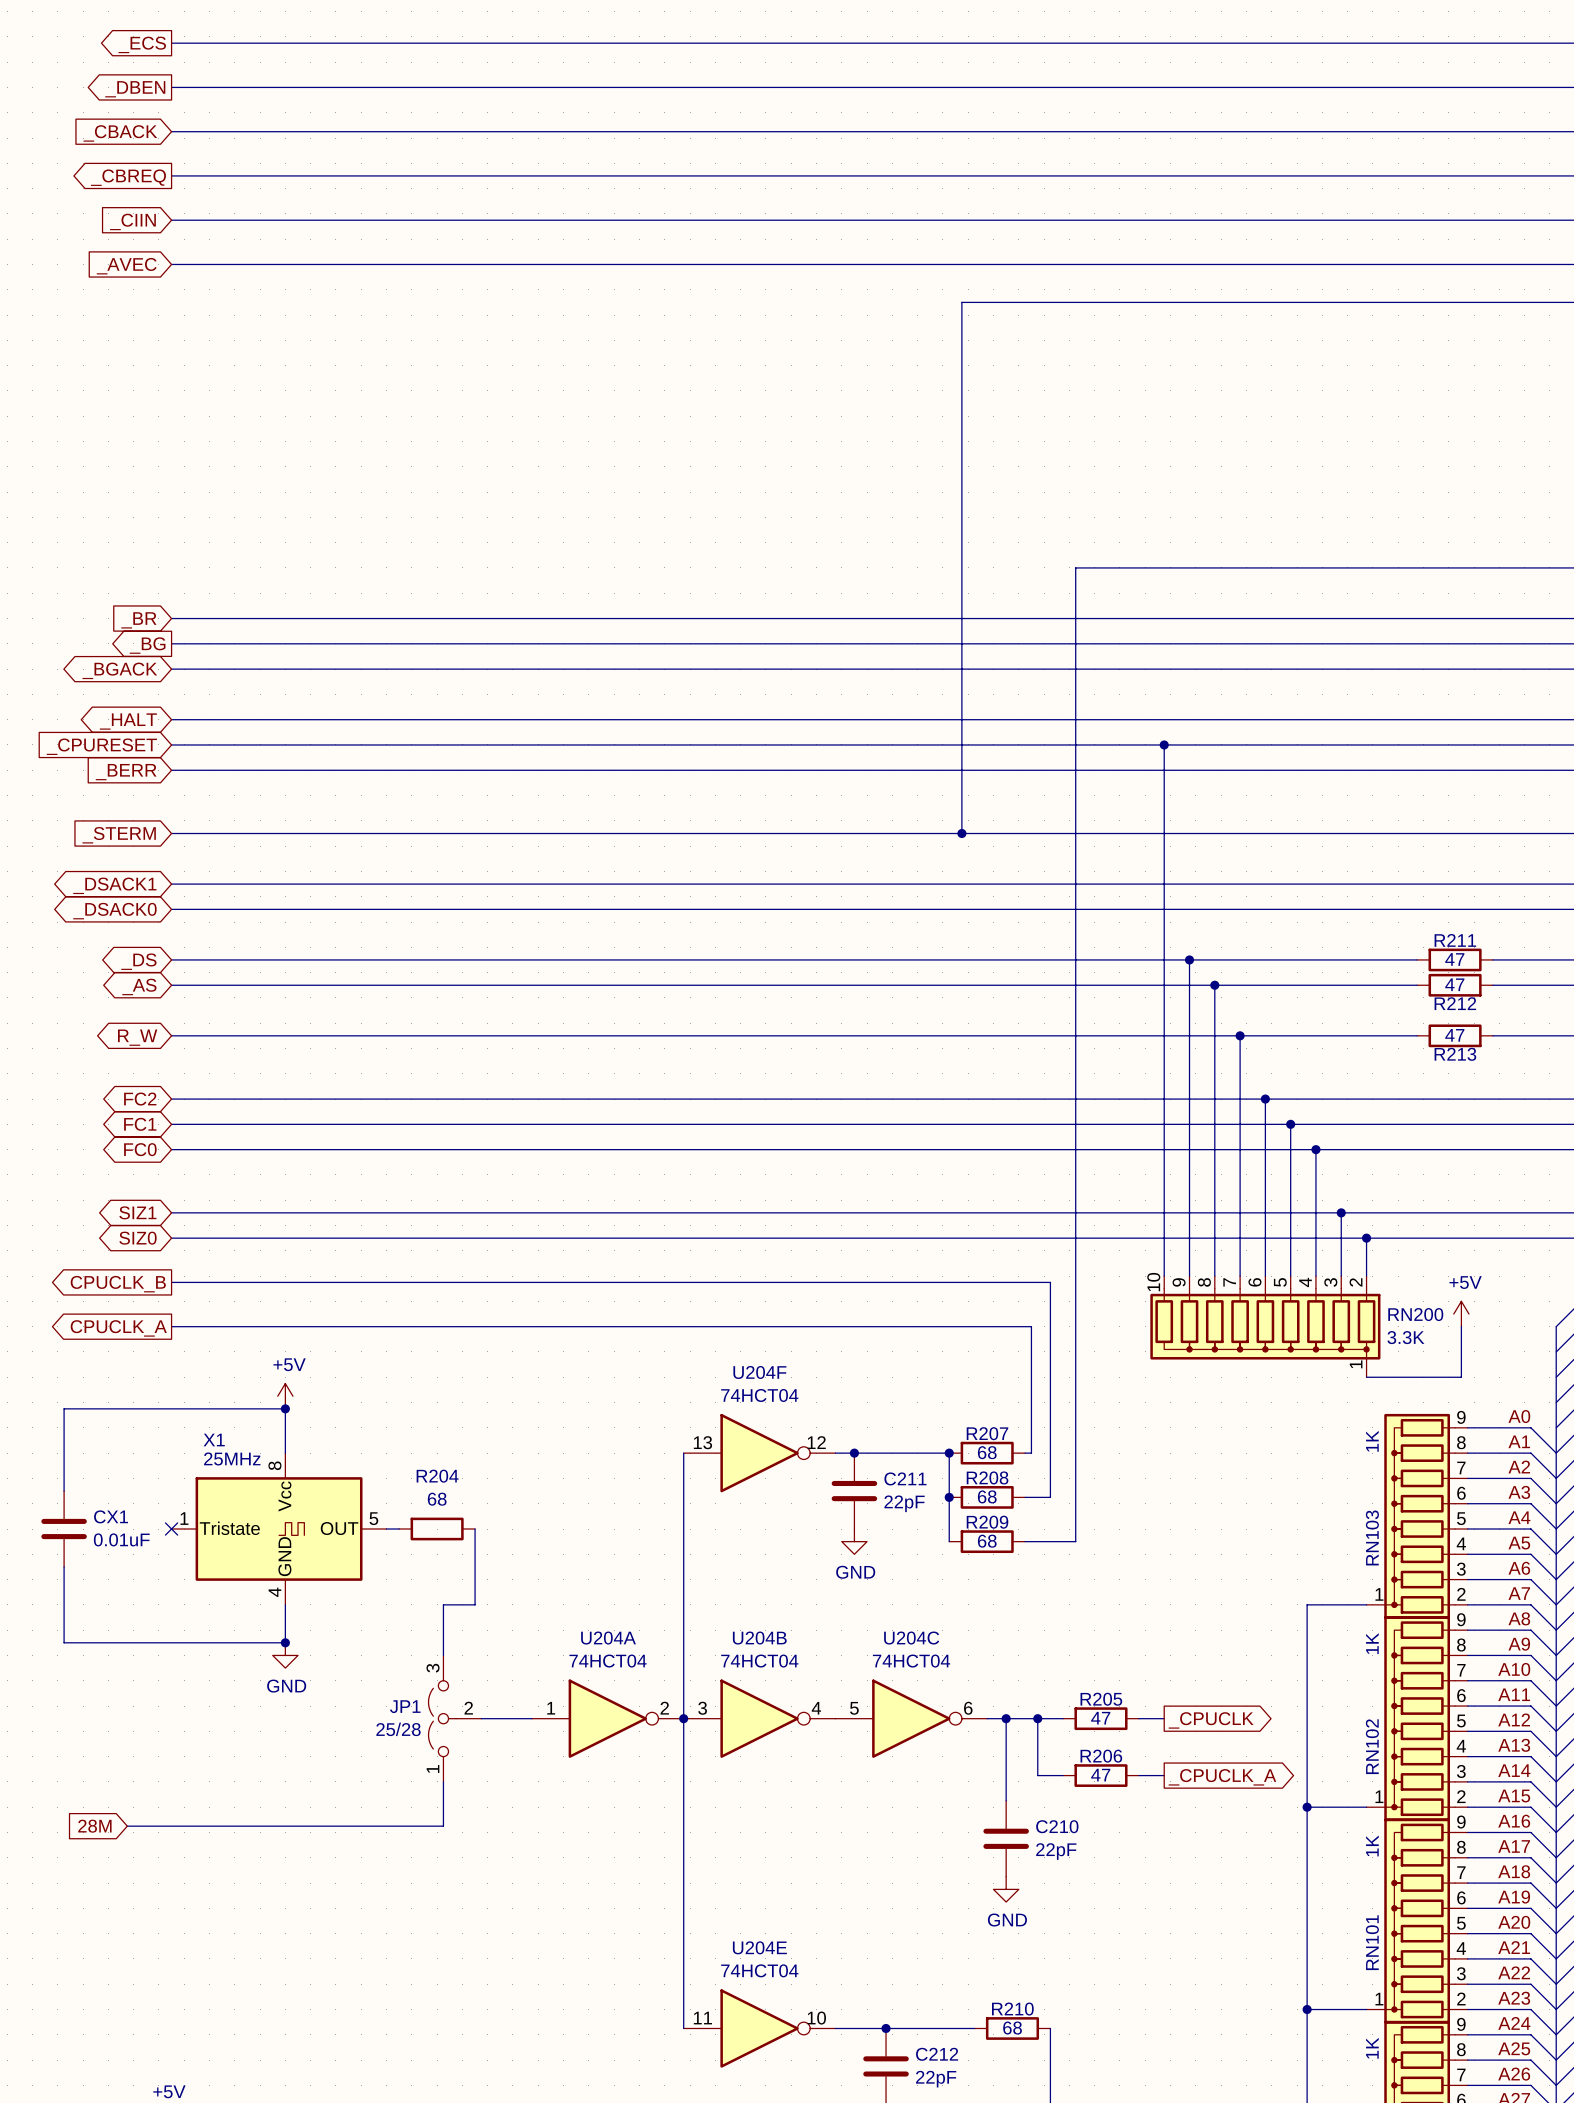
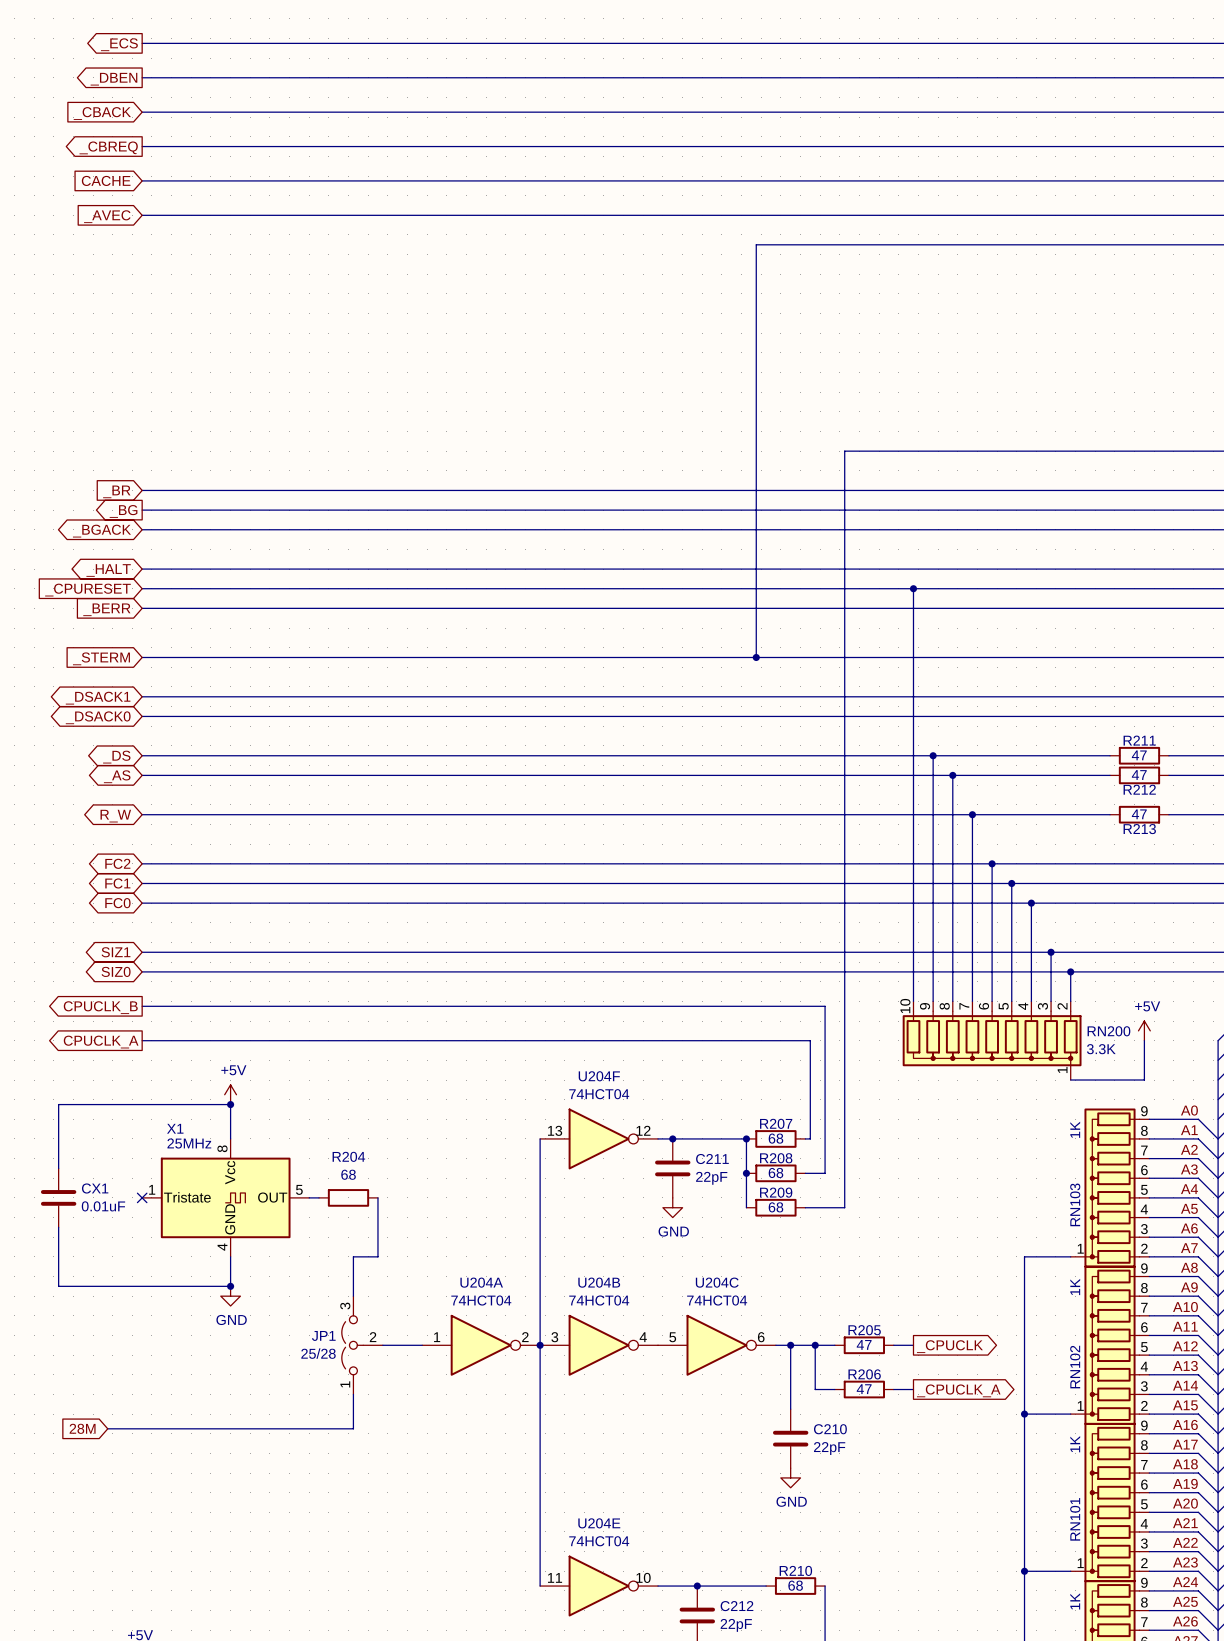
global label: _CIIN (132, 221) -> CACHE (106, 180)

